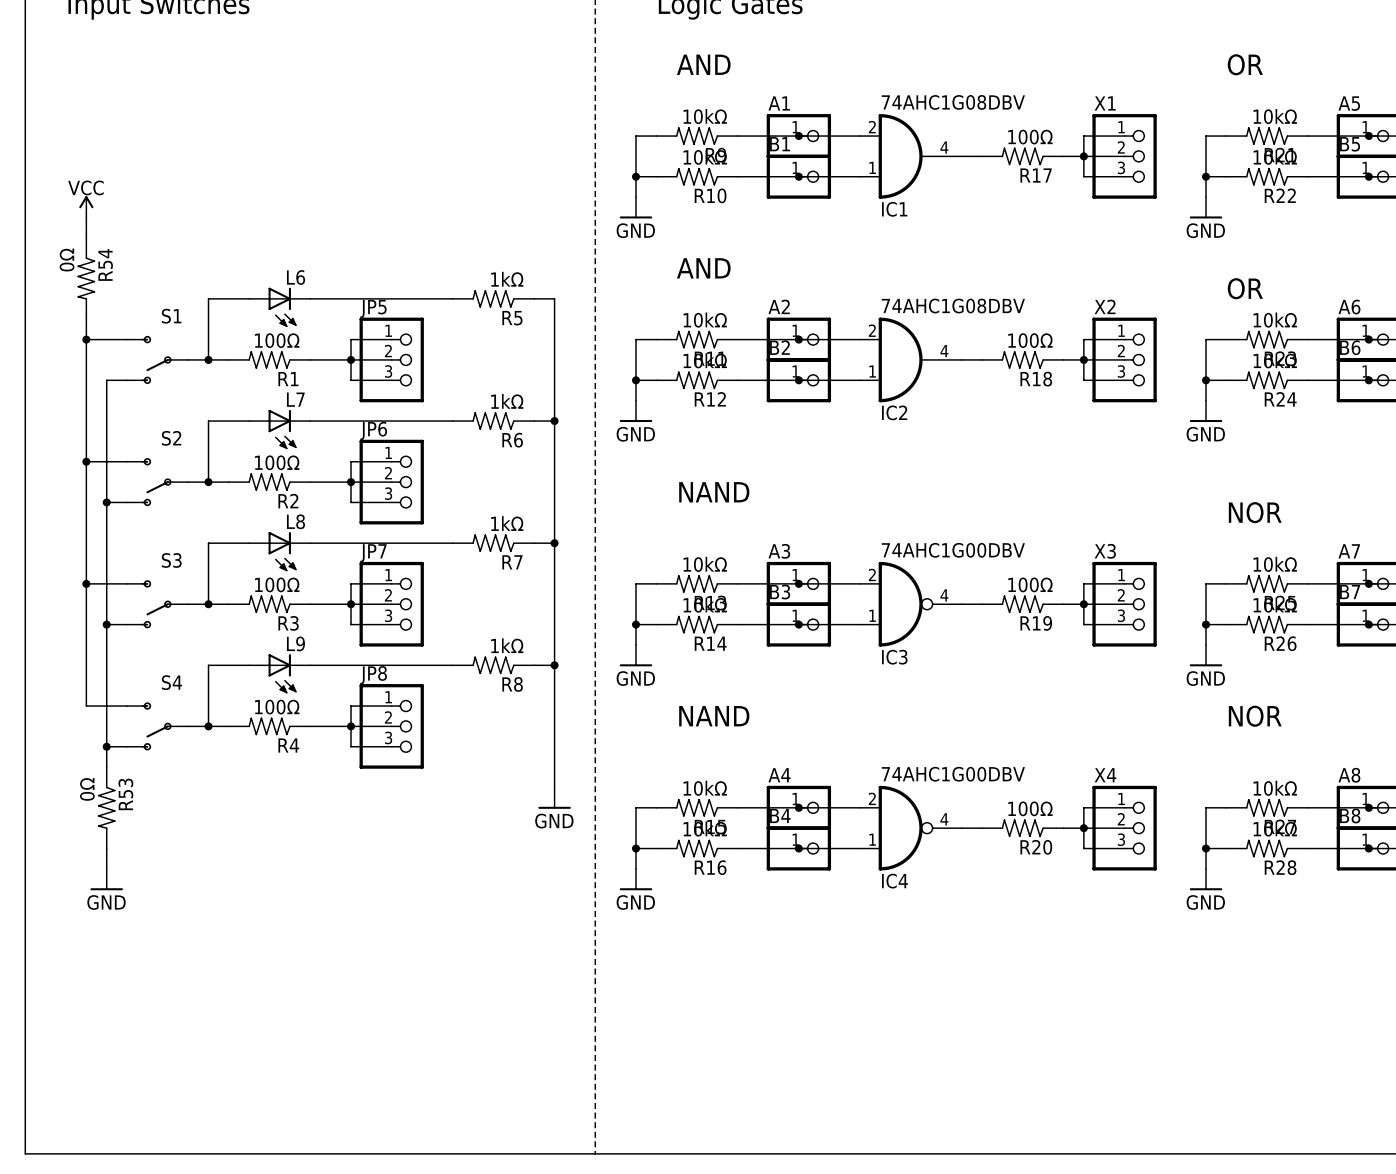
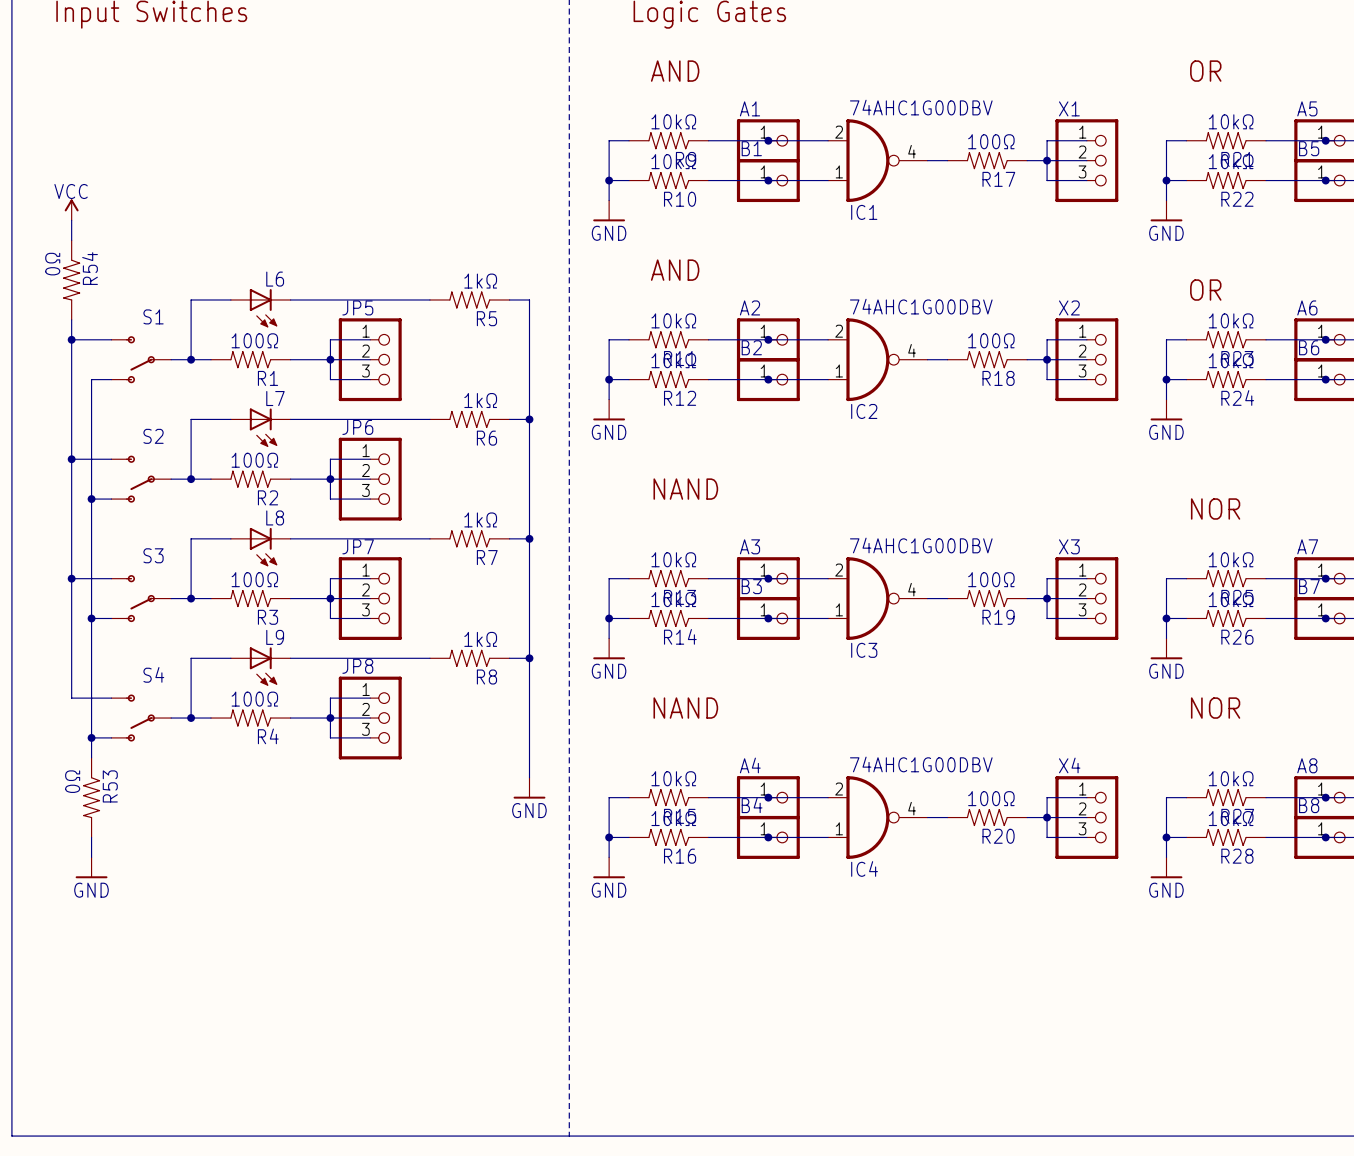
IC1 value: 74AHC1G08DBV (953, 102) -> 74AHC1G00DBV (921, 107)
IC1 symbol: [859, 114, 962, 199] -> [828, 119, 928, 203]
IC2 value: 74AHC1G08DBV (953, 306) -> 74AHC1G00DBV (921, 306)
IC2 symbol: [859, 317, 962, 403] -> [828, 318, 928, 402]

